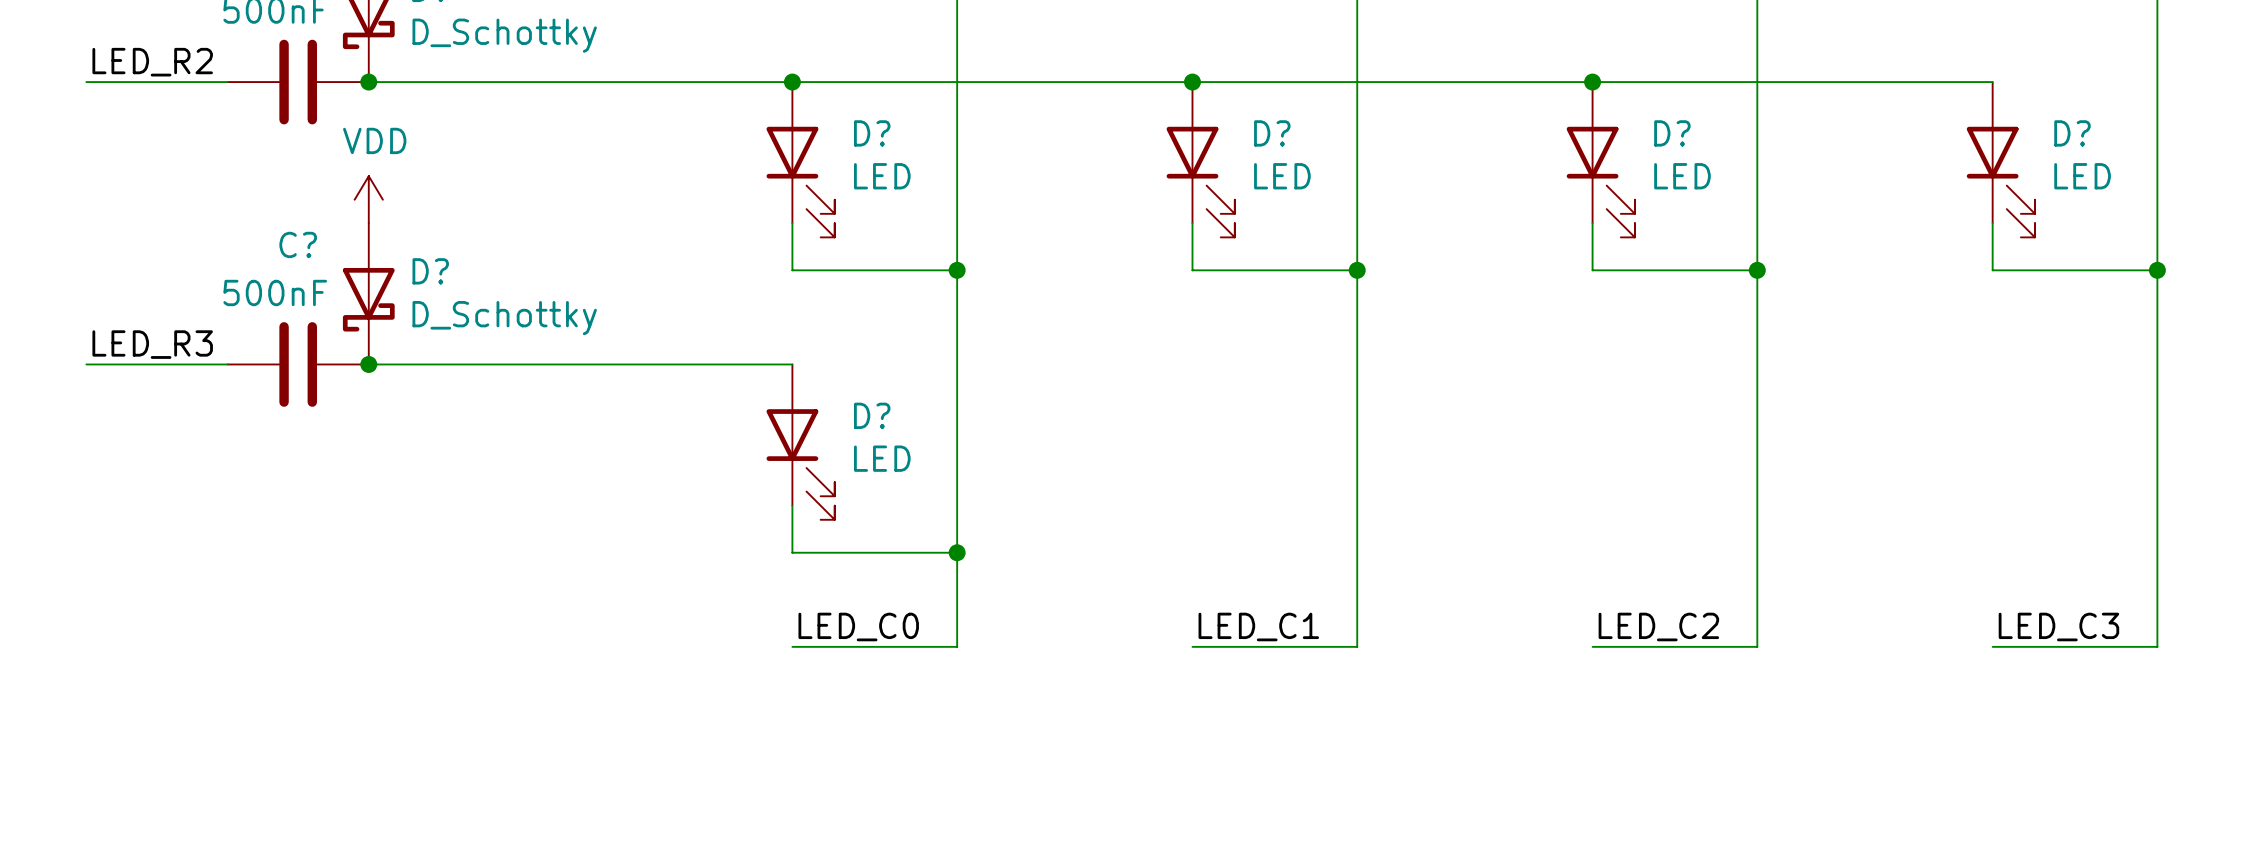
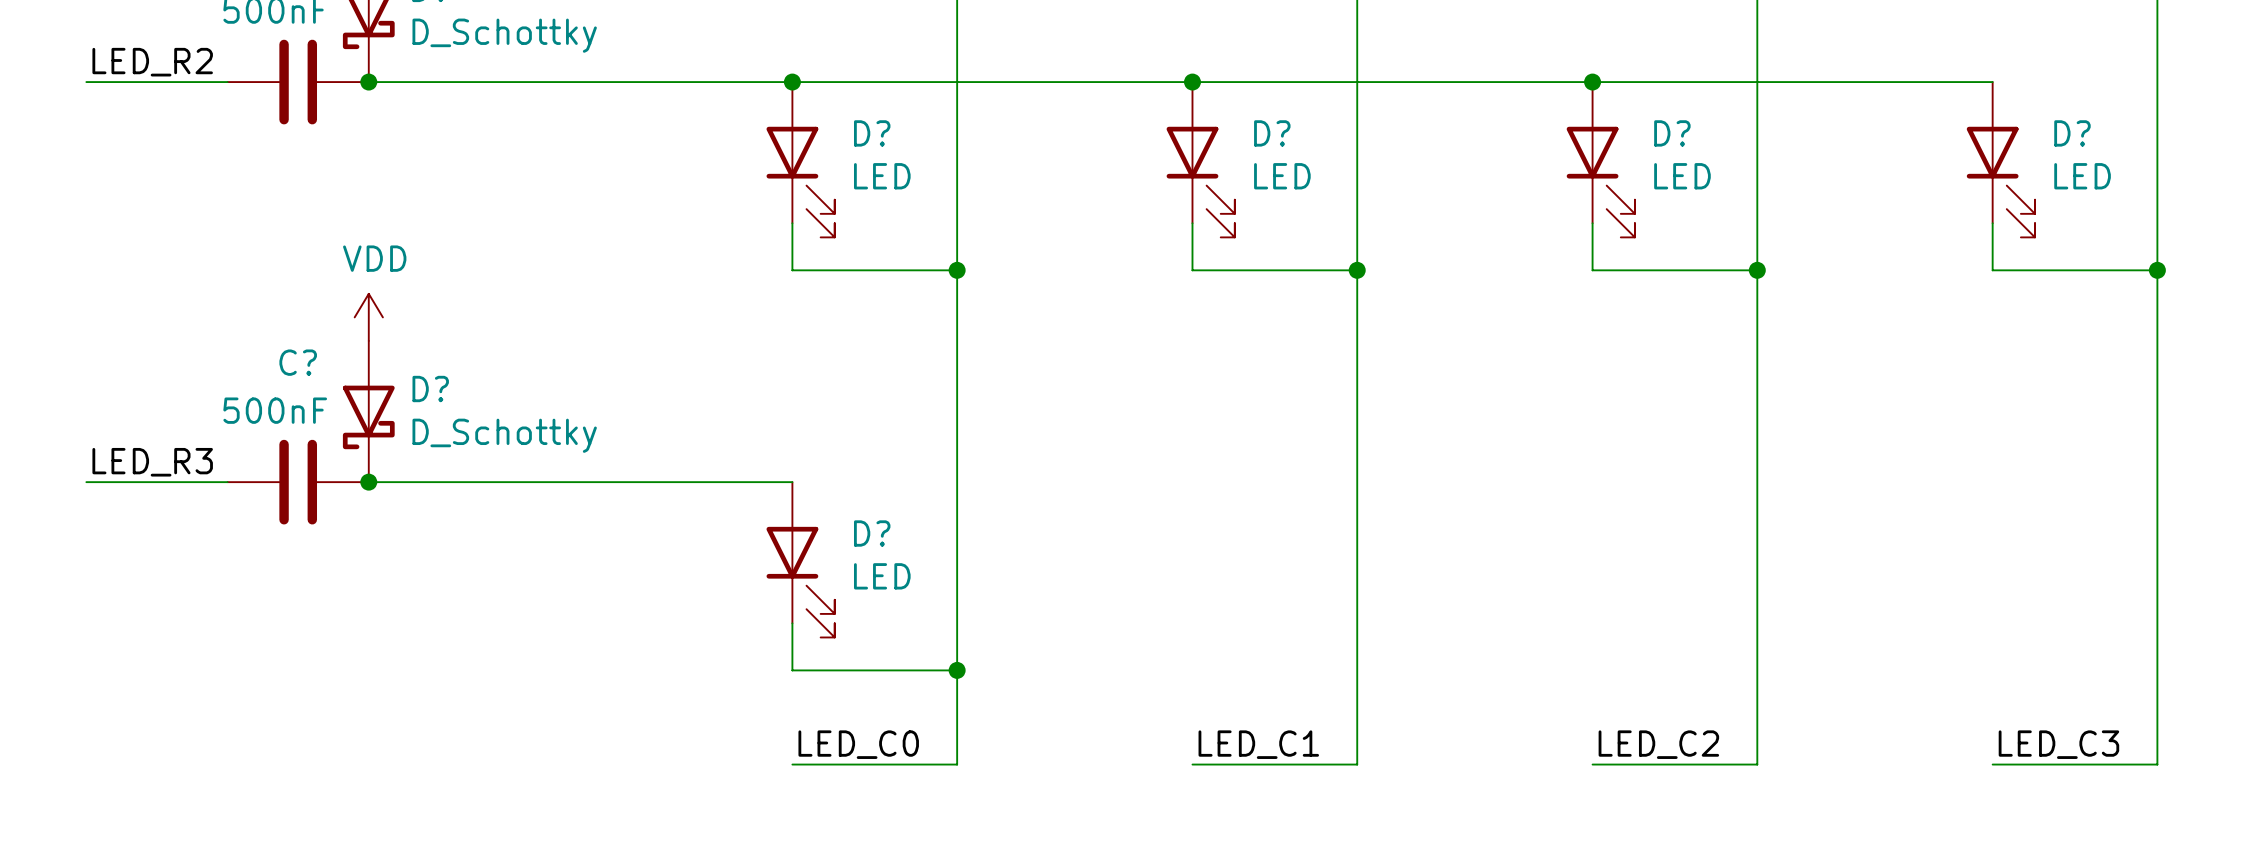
power symbol position: VDD (368, 199) -> VDD (368, 317)
D? position: (368, 293) -> (368, 411)
label position: LED_R3 (152, 344) -> LED_R3 (152, 462)
wire: (86, 364) (227, 364) -> (86, 482) (227, 482)
C? position: (298, 364) -> (298, 482)
wire: (368, 364) (792, 364) -> (368, 482) (792, 482)
junction: (368, 364) -> none
D? position: (800, 442) -> (800, 559)
junction: none -> (368, 482)
wire: (792, 505) (792, 552) (957, 552) -> (792, 623) (792, 670) (957, 670)
junction: (957, 552) -> none
label position: LED_C0 (858, 626) -> LED_C0 (858, 744)
label position: LED_C1 (1258, 626) -> LED_C1 (1258, 744)
label position: LED_C2 (1658, 626) -> LED_C2 (1658, 744)
label position: LED_C3 (2058, 626) -> LED_C3 (2058, 744)
wire: (792, 646) (957, 646) -> (792, 764) (957, 764) (957, 646)
wire: (1192, 646) (1357, 646) -> (1192, 764) (1357, 764) (1357, 646)
wire: (1592, 646) (1757, 646) -> (1592, 764) (1757, 764) (1757, 646)
wire: (1992, 646) (2157, 646) -> (1992, 764) (2157, 764) (2157, 646)
junction: none -> (957, 670)

